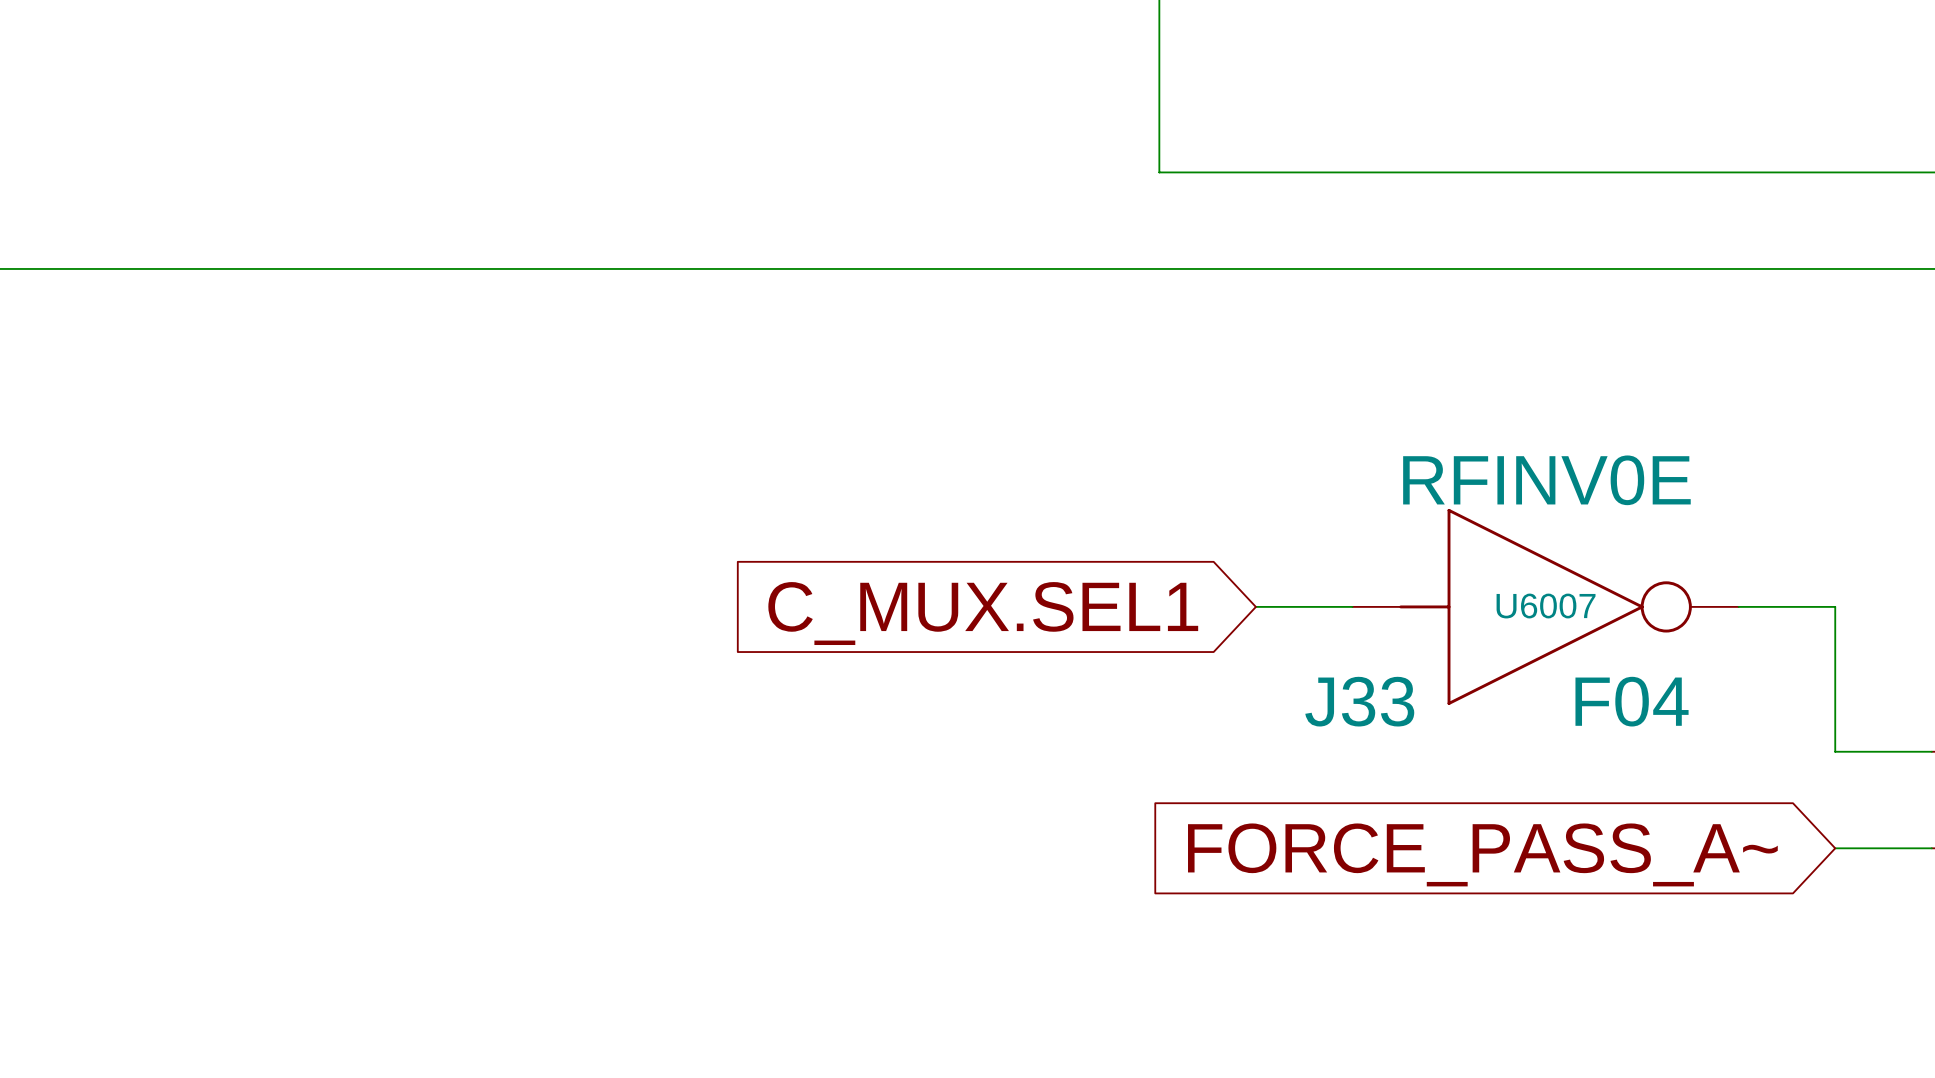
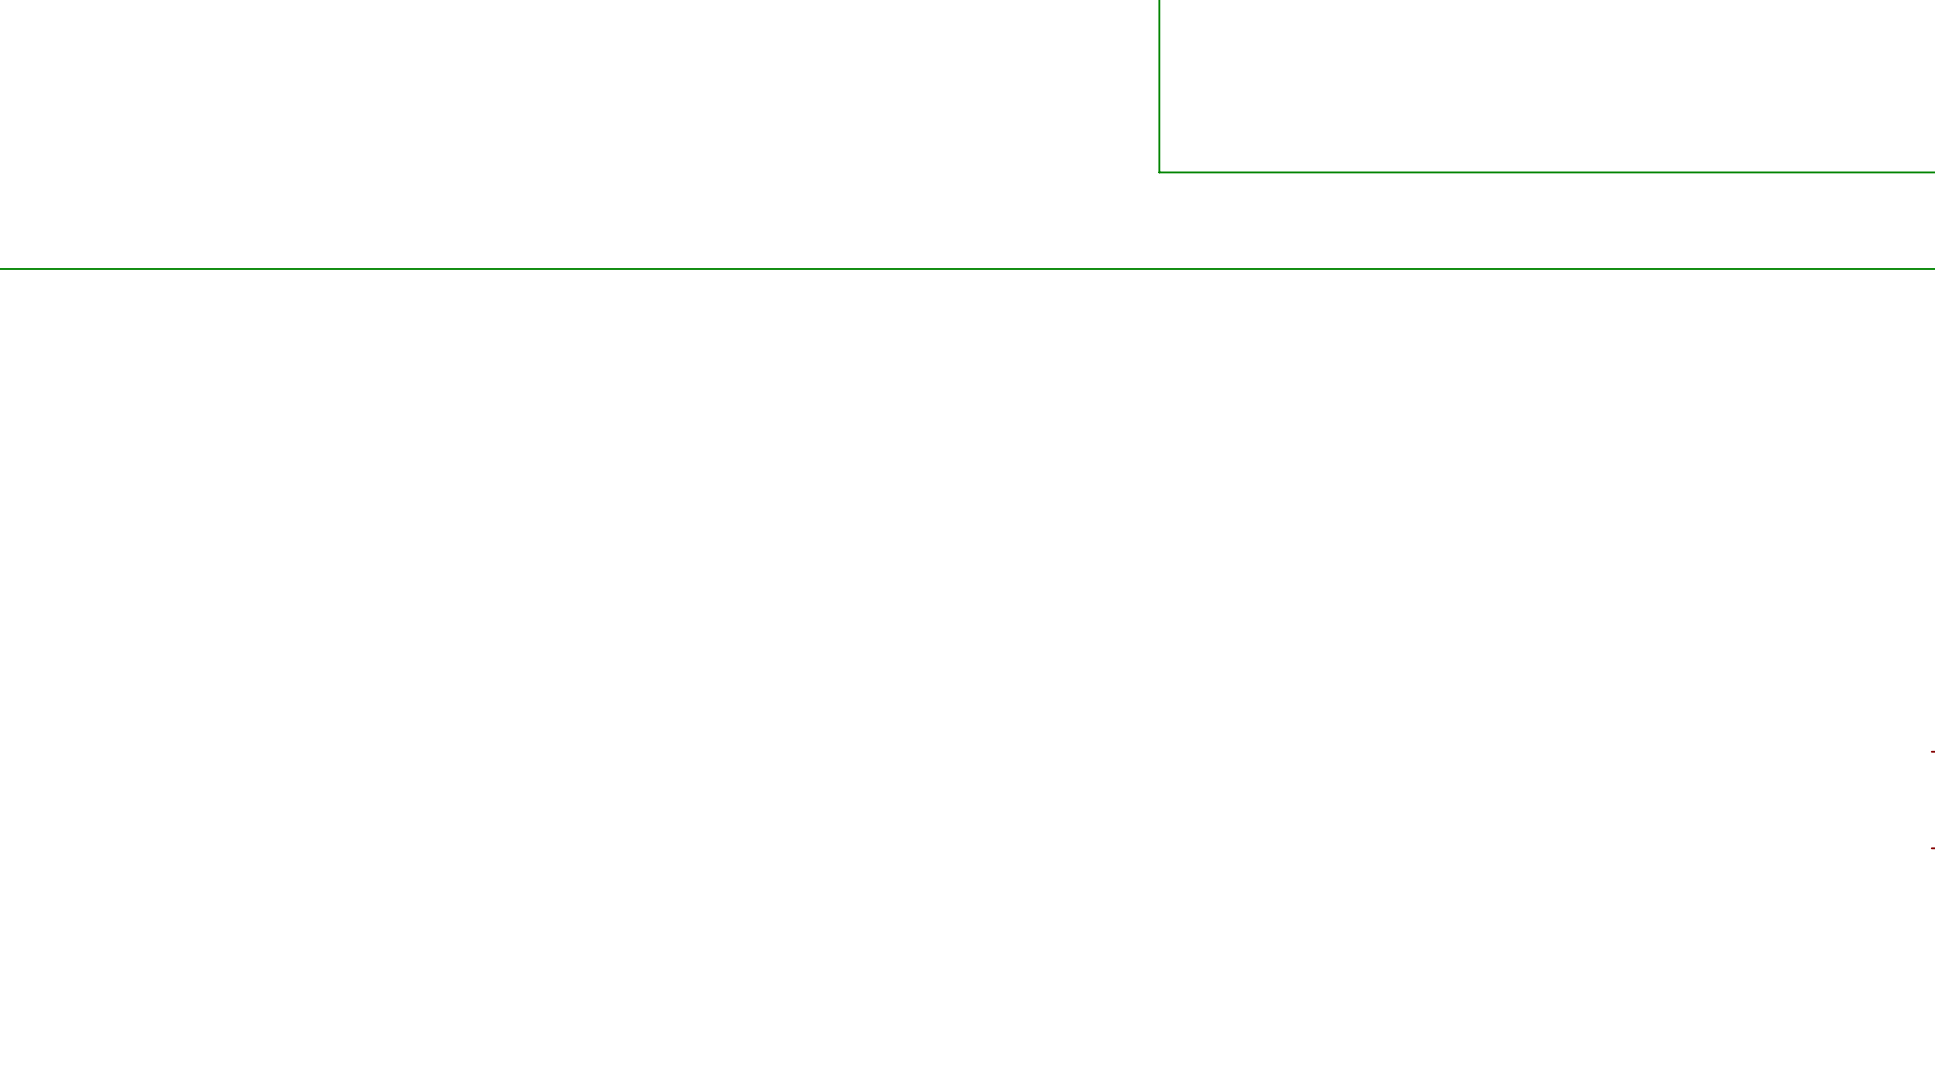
wire: (1255, 606) (1352, 606) -> none
U6007: F04 (1545, 606) -> none
wire: (1738, 606) (1835, 606) (1835, 751) (1931, 751) -> none
global label: C_MUX.SEL1 (983, 613) -> none
wire: (1835, 848) (1931, 848) -> none
global label: FORCE_PASS_A~ (1482, 854) -> none

